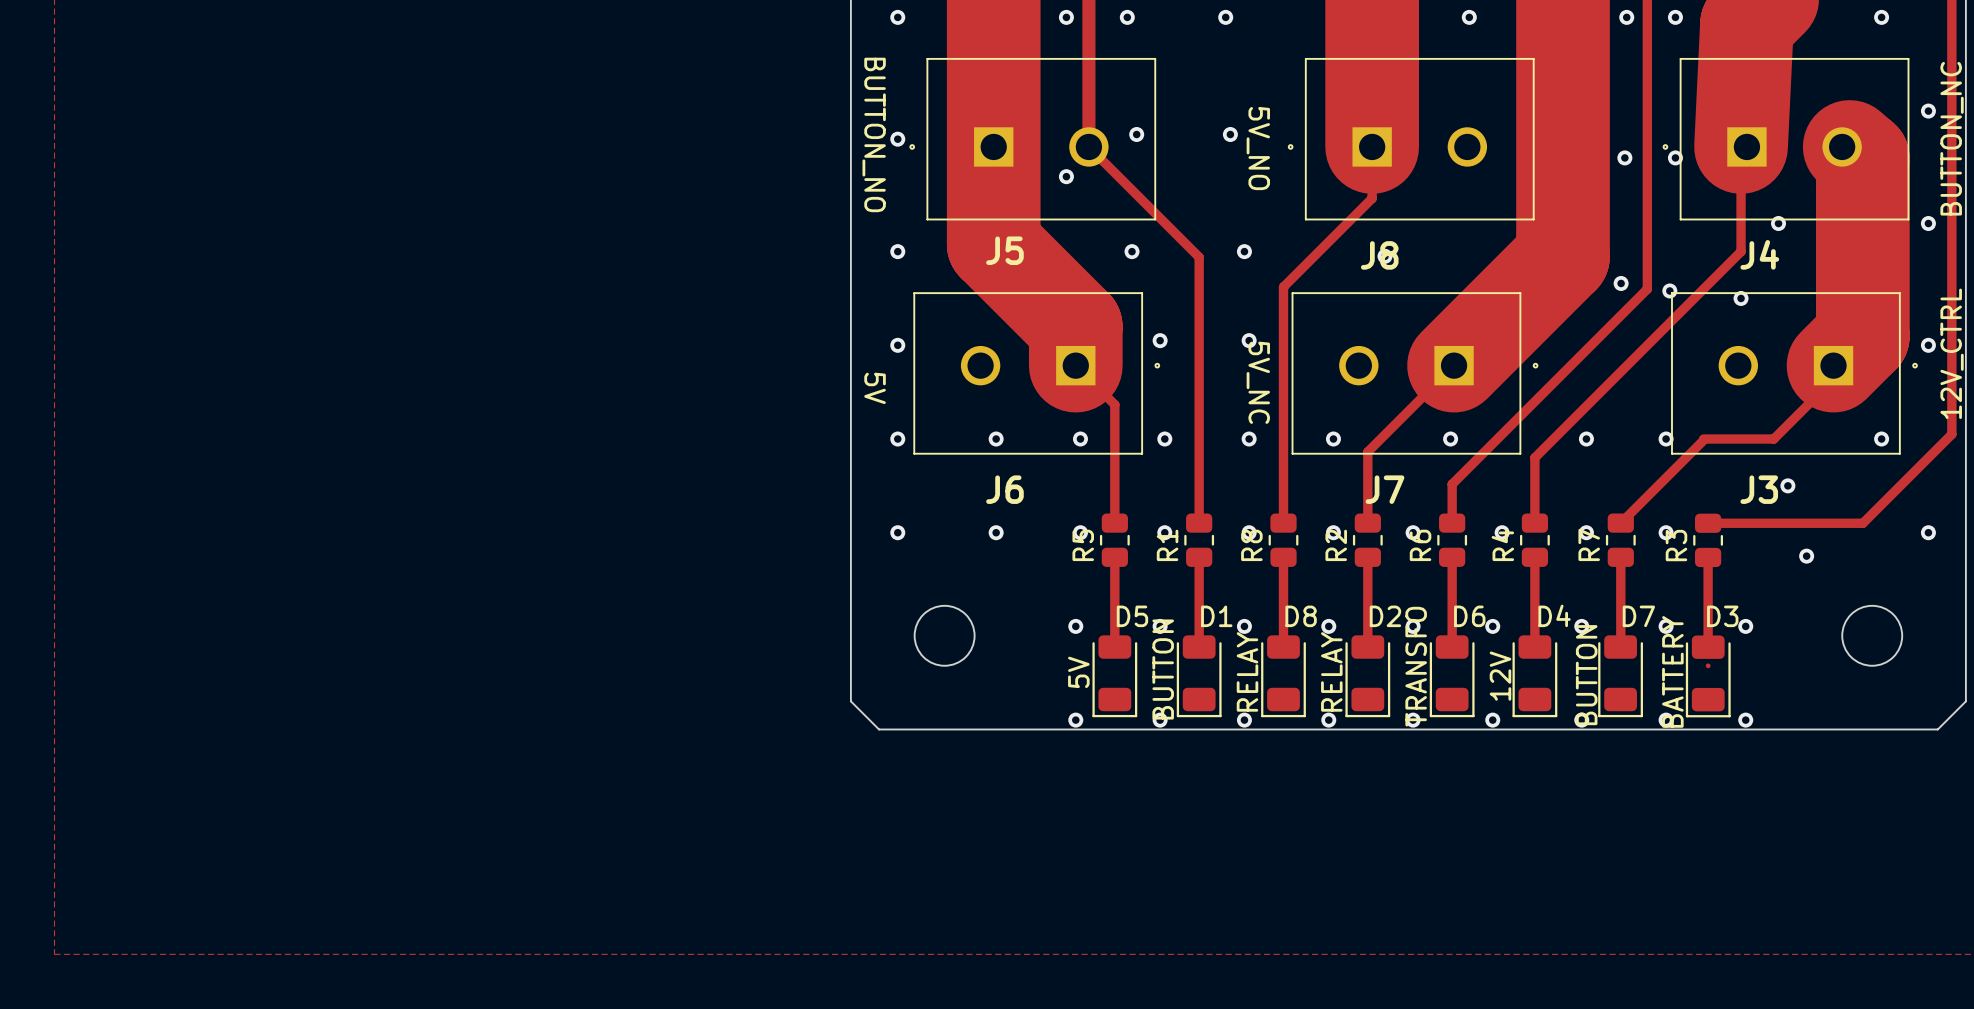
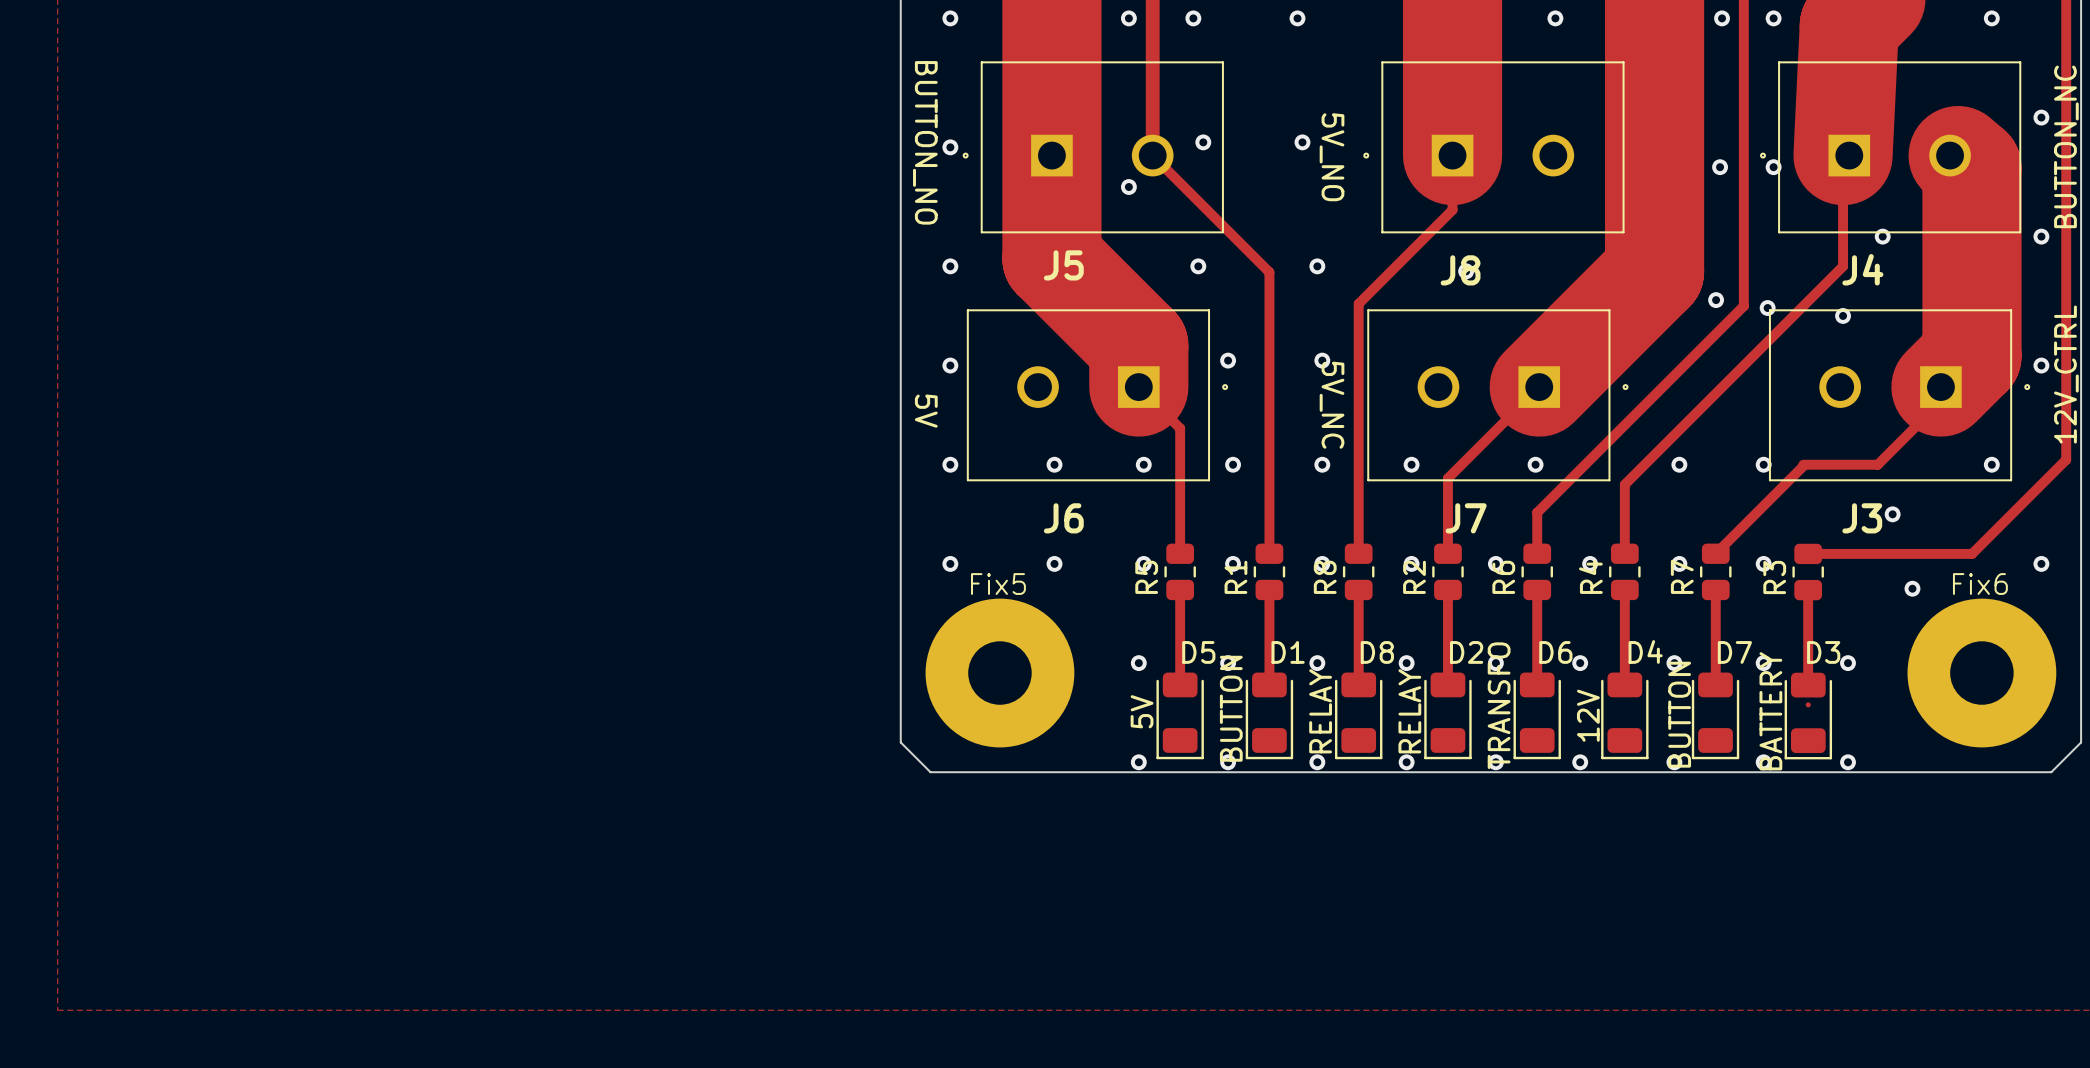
round board edge: [913, 604, 976, 667] -> none
round board edge: [1841, 604, 1904, 667] -> none
Fix5: none -> (999, 673)
Fix6: none -> (1981, 673)

